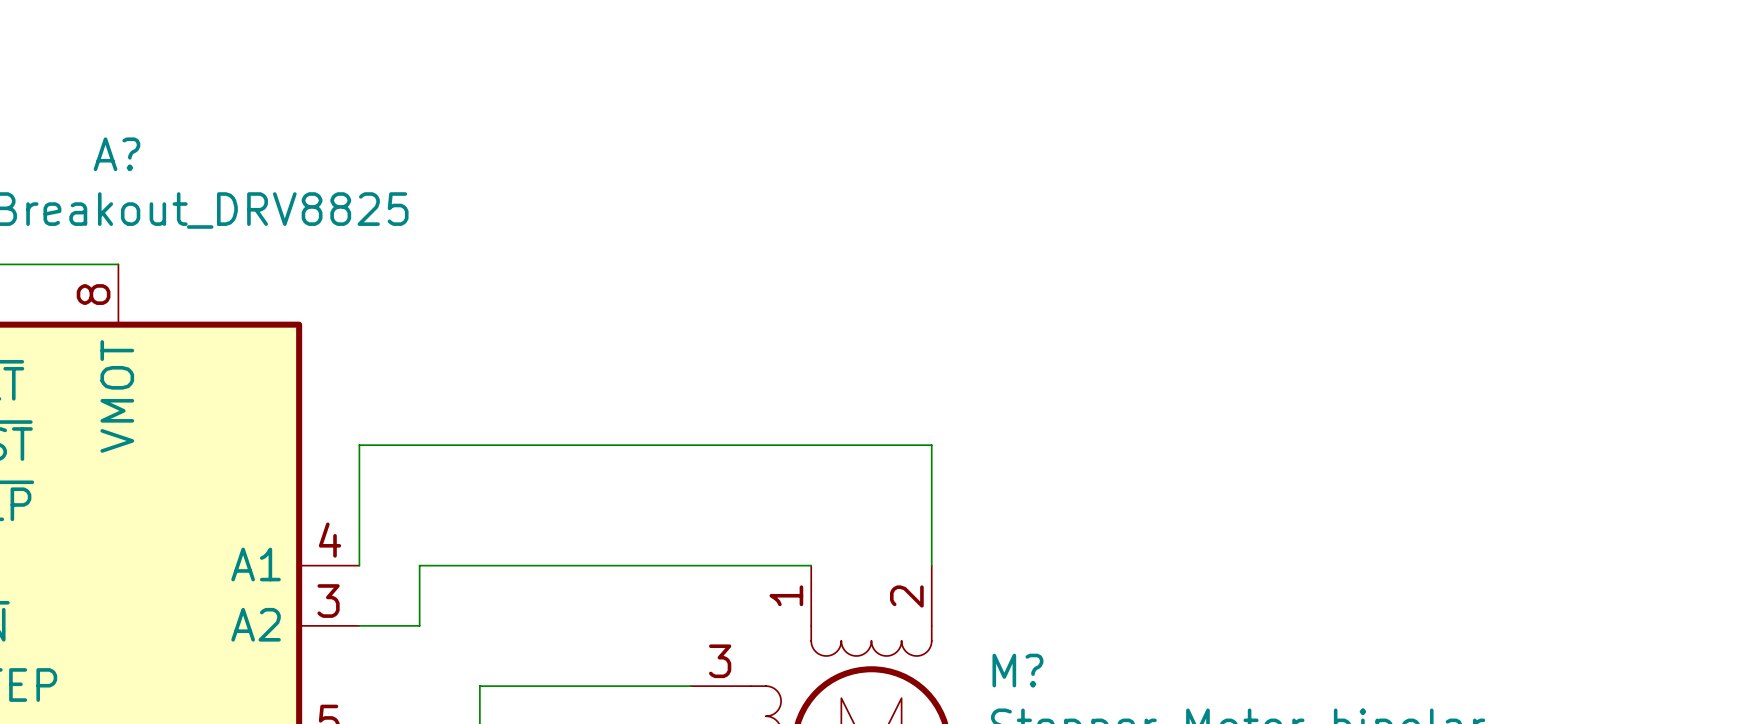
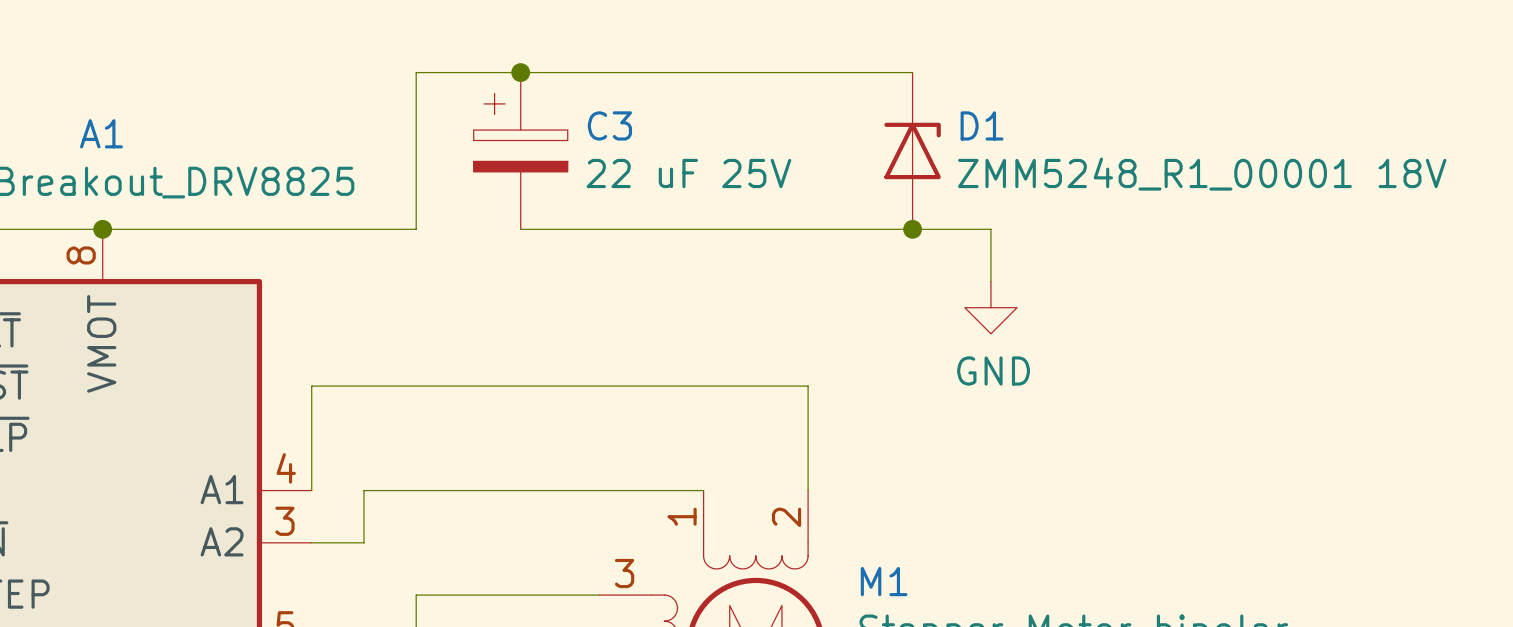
junction: none -> (520, 72)
wire: none -> (912, 72) (416, 72) (416, 229) (102, 229)
A? name: A? (116, 154) -> A1 (101, 133)
C3: none -> 22 uF 25V (520, 150)
D1: none -> ZMM5248_R1_00001 18V (912, 150)
junction: none -> (102, 229)
wire: none -> (520, 229) (990, 229) (990, 281)
junction: none -> (912, 229)
power symbol: none -> GND (990, 307)
M? name: M? (1017, 670) -> M1 (884, 581)

